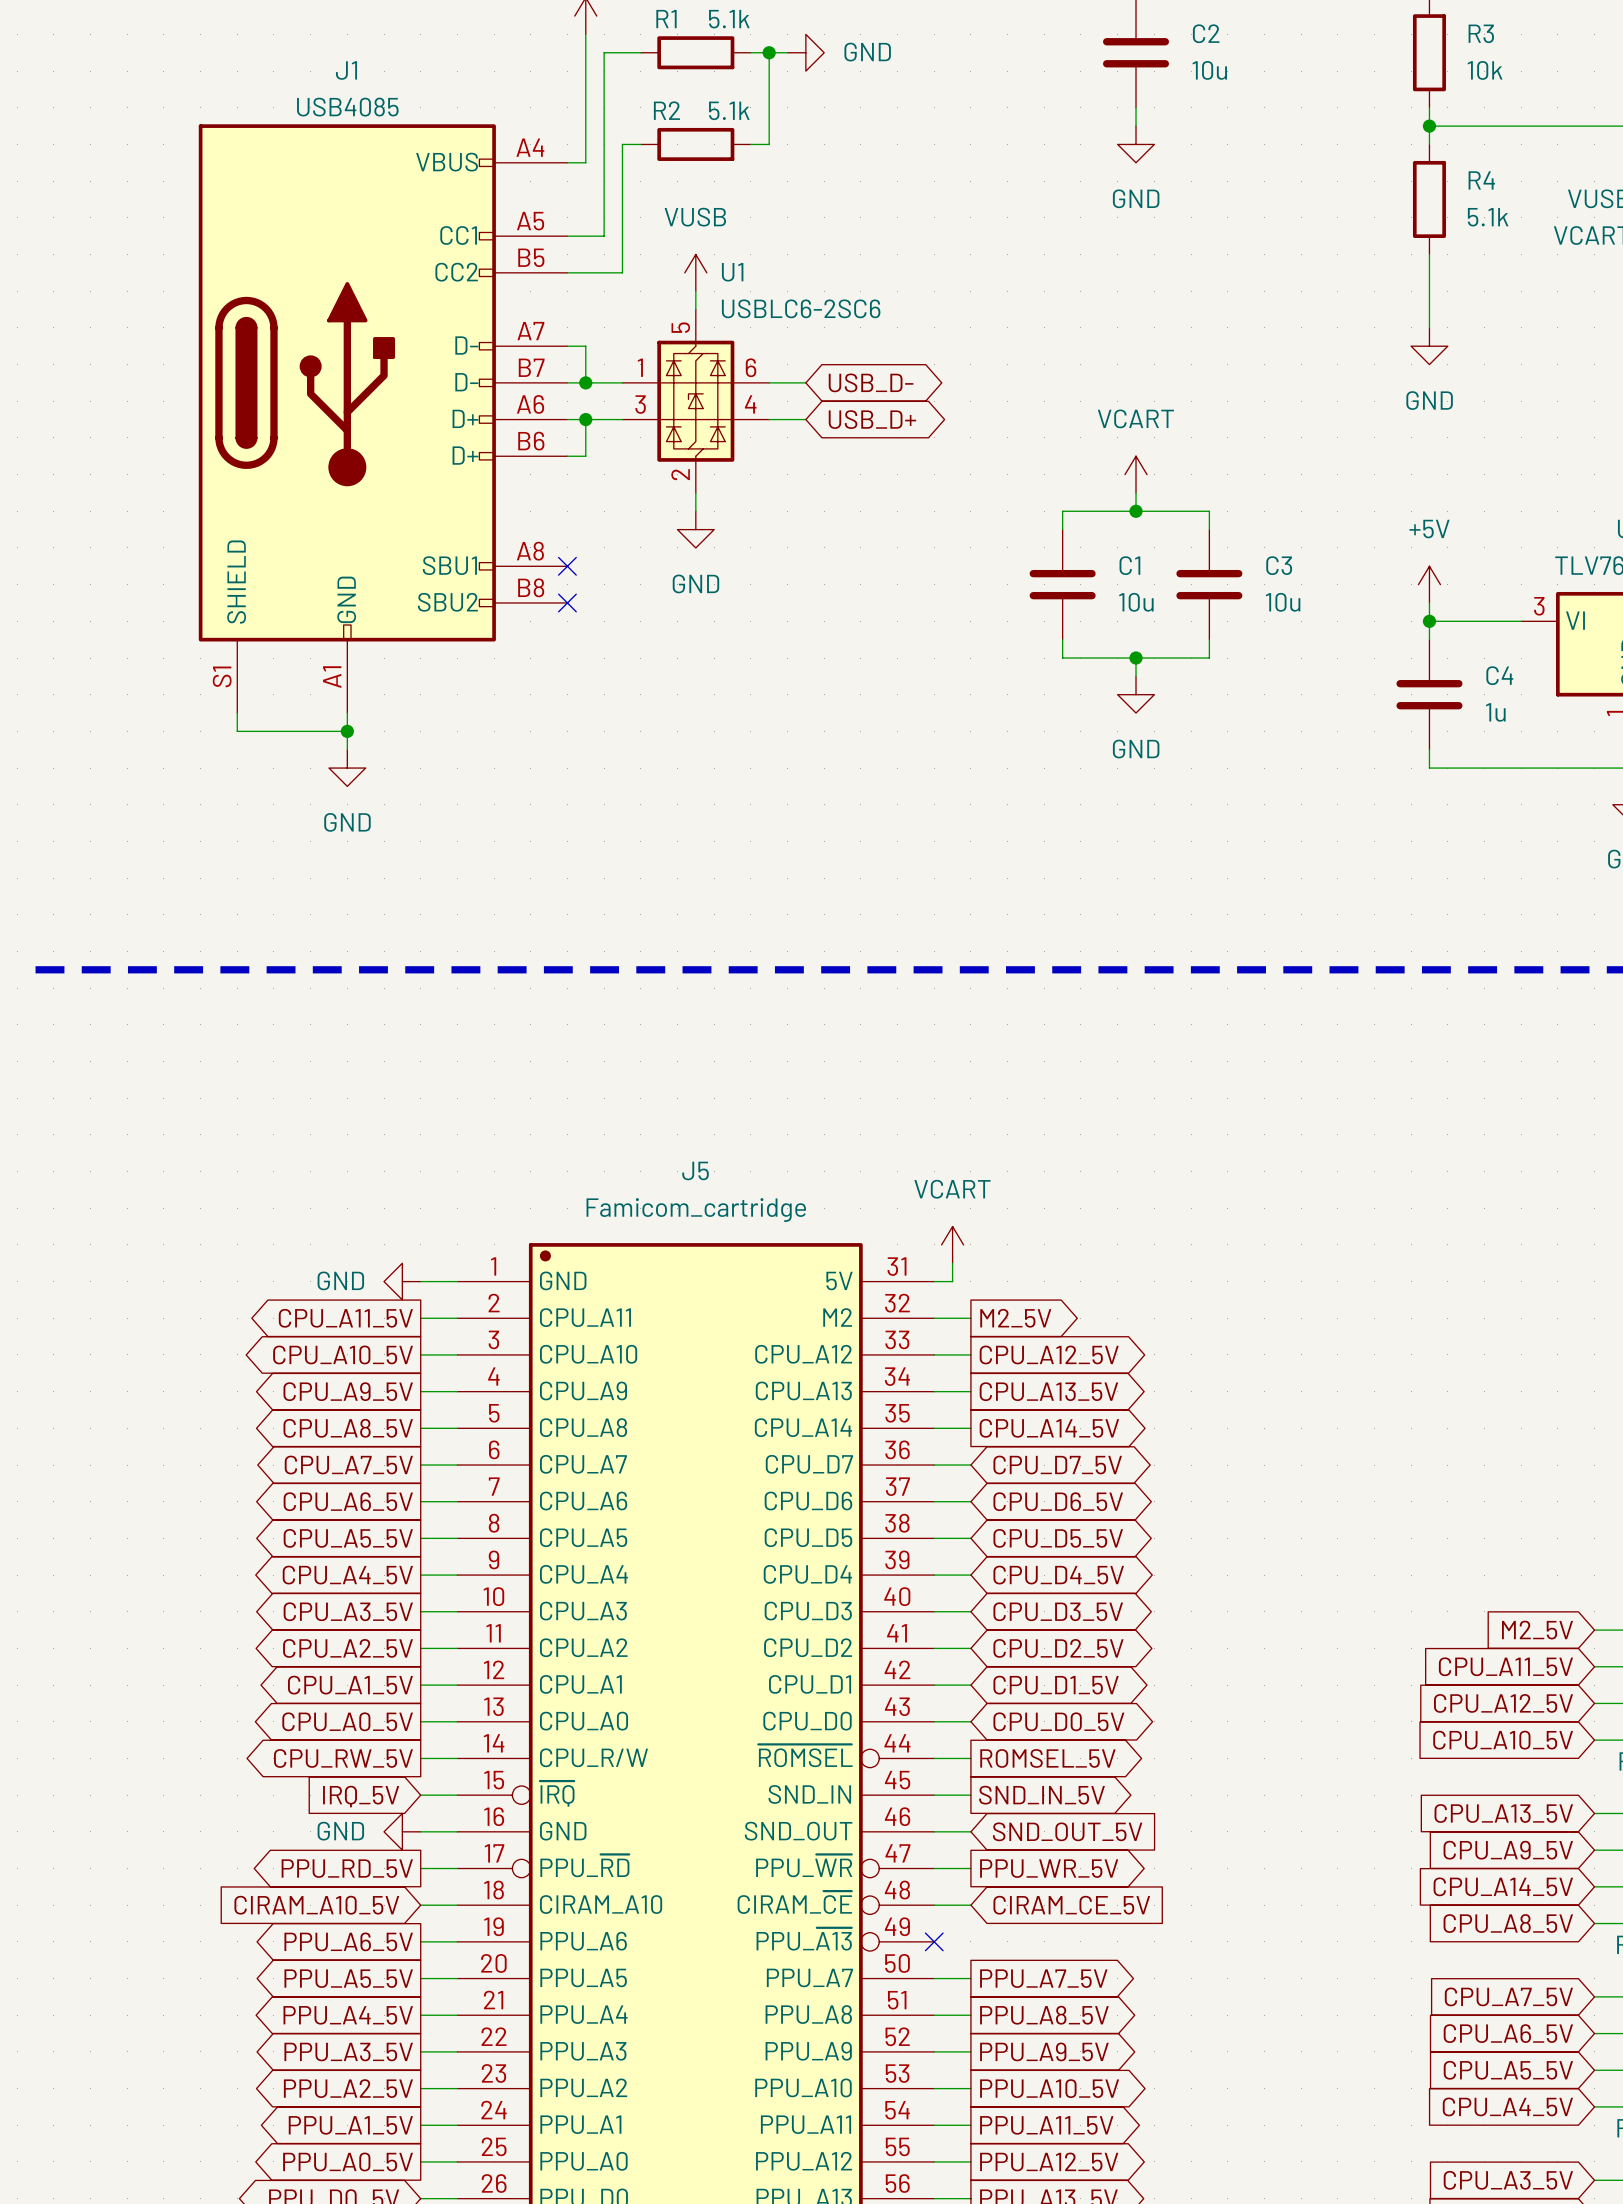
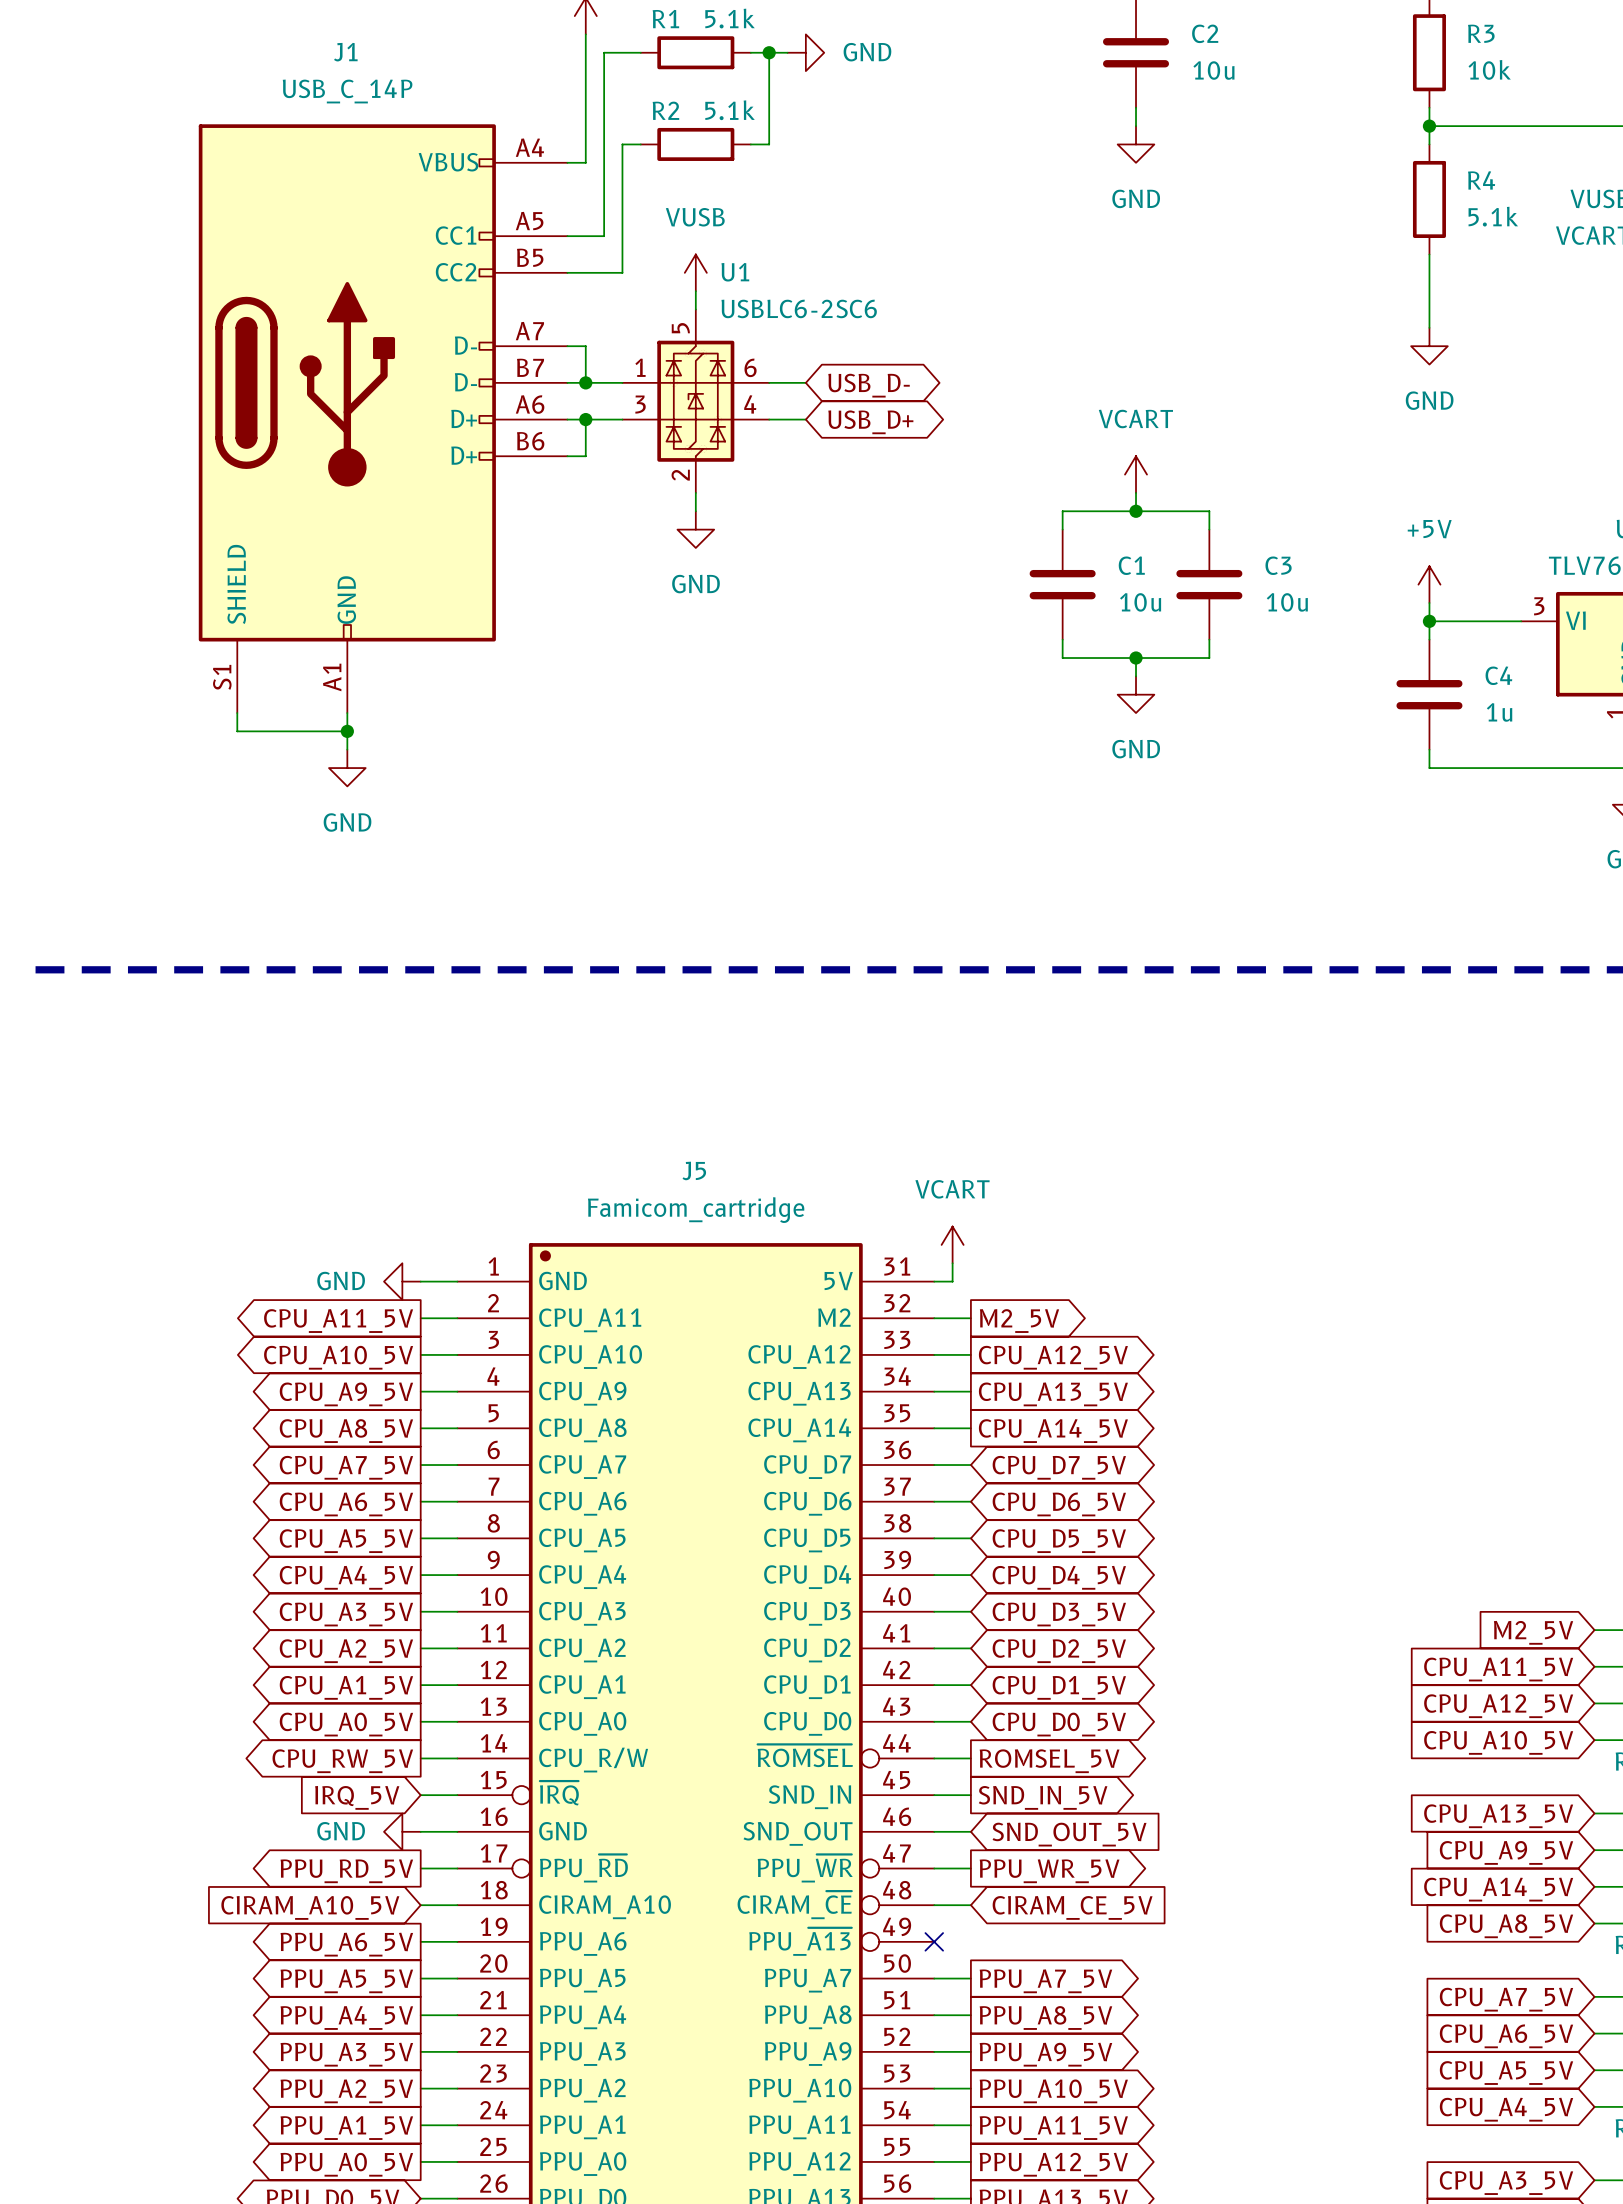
J1 value: USB4085 (347, 107) -> USB_C_14P (347, 91)
J1 symbol: [198, 124, 568, 714] -> [198, 124, 568, 714]
no-connect mark: (567, 566) -> none
no-connect mark: (567, 602) -> none

